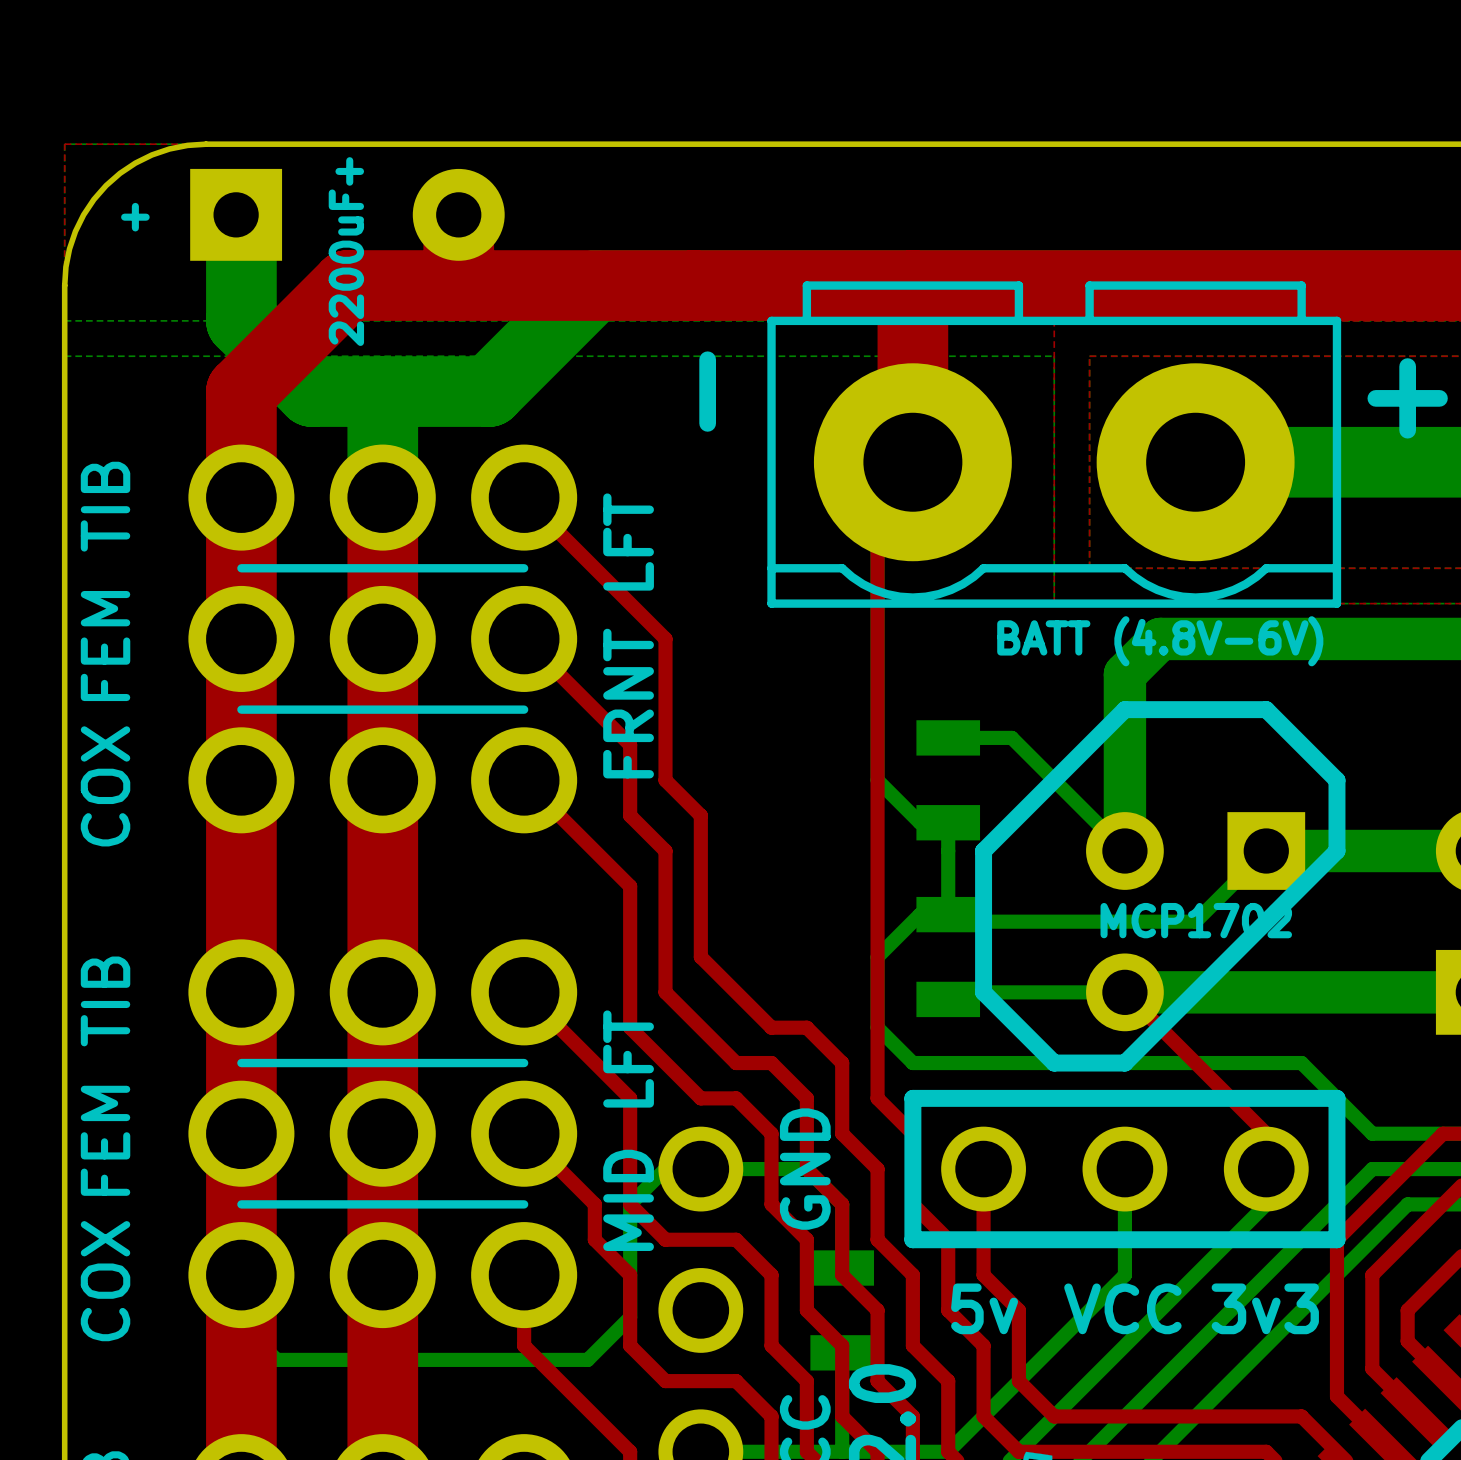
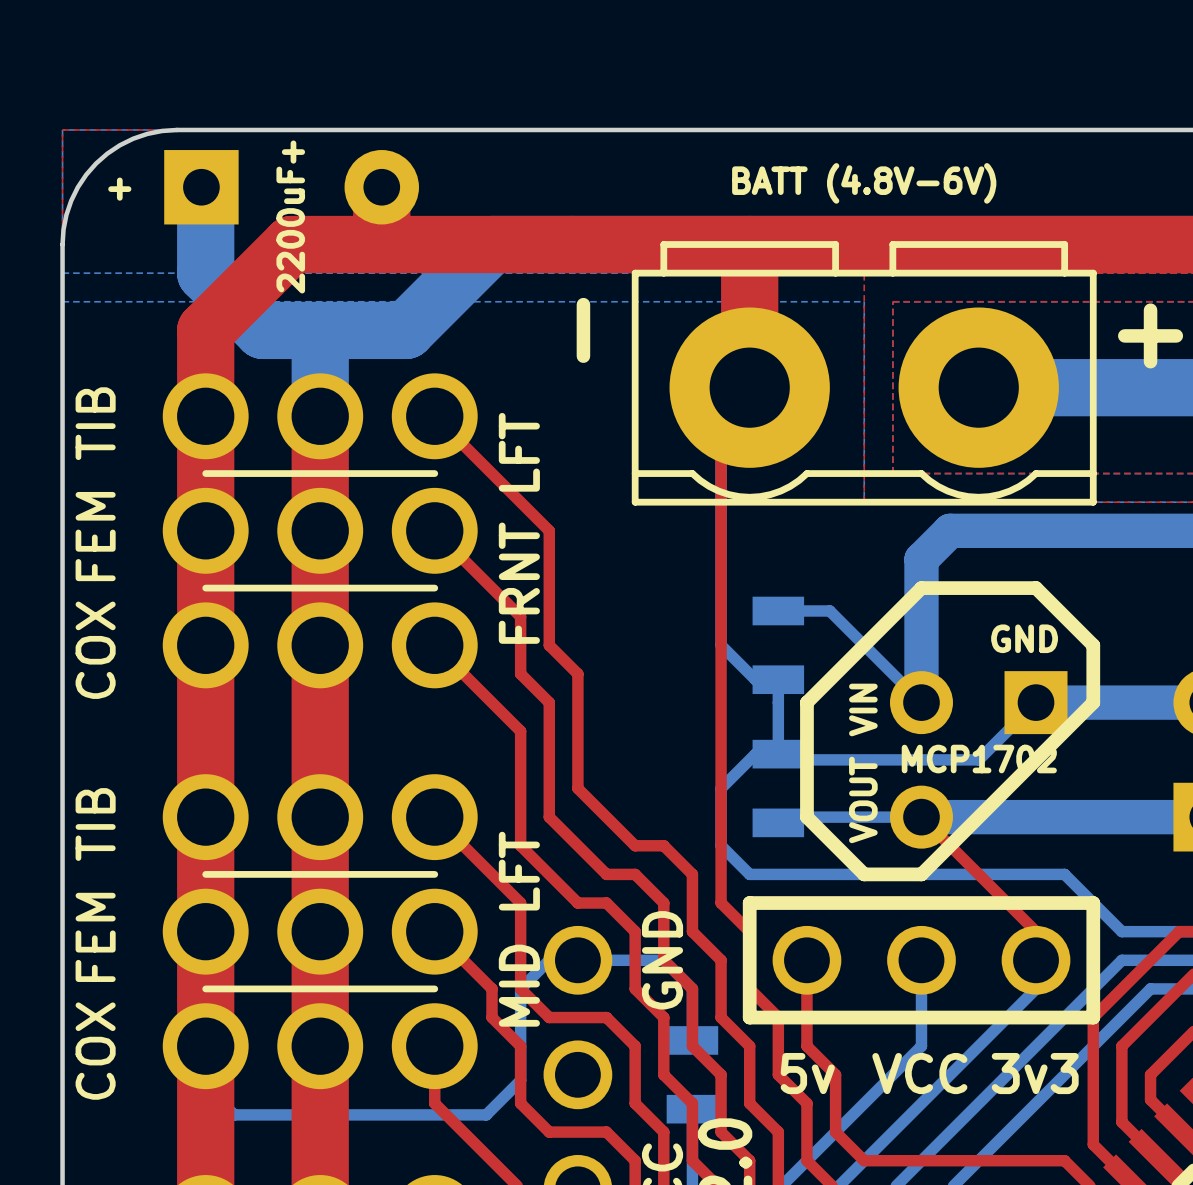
part value position: BATT (4.8V-6V) (1160, 641) -> BATT (4.8V-6V) (864, 183)
text: none -> GND (1024, 638)
text: none -> VIN (863, 709)
text: none -> VOUT (863, 799)

